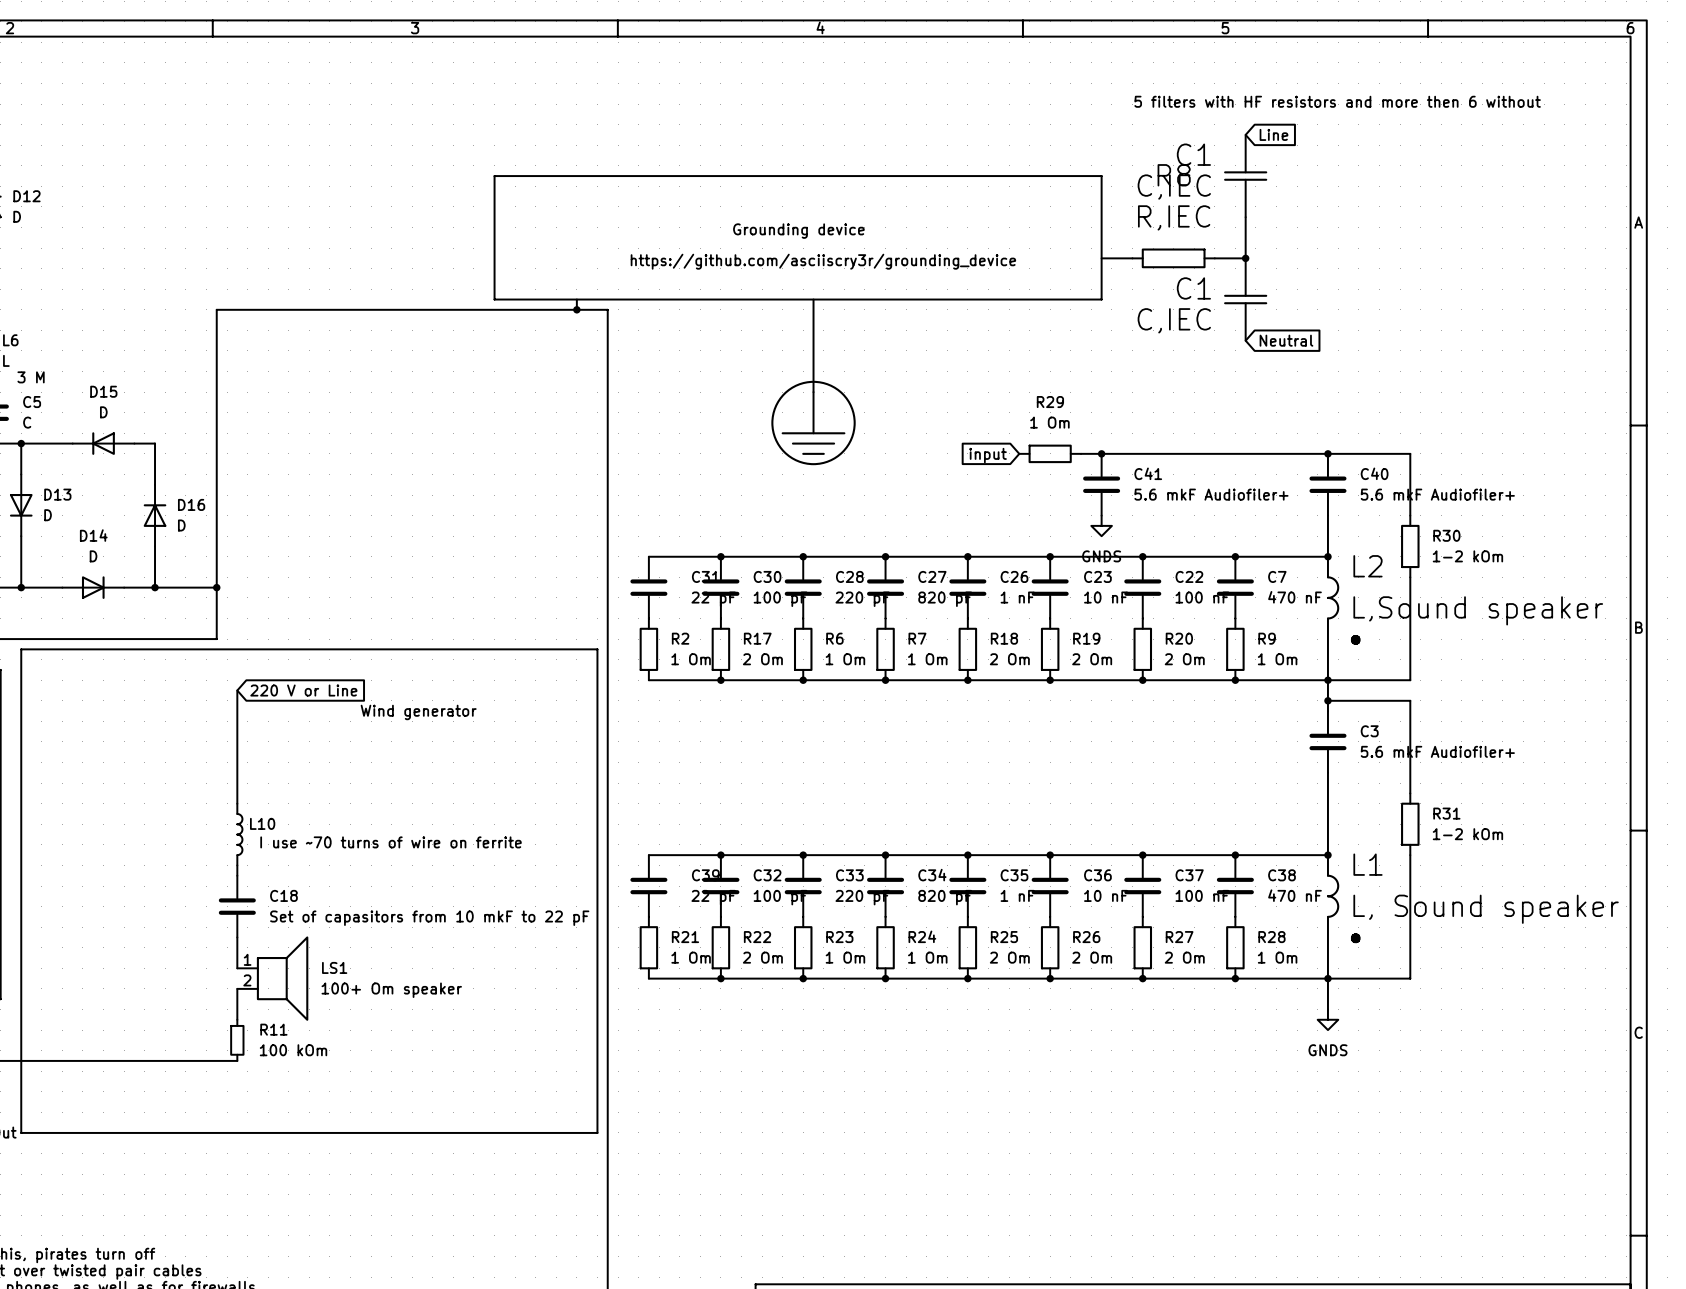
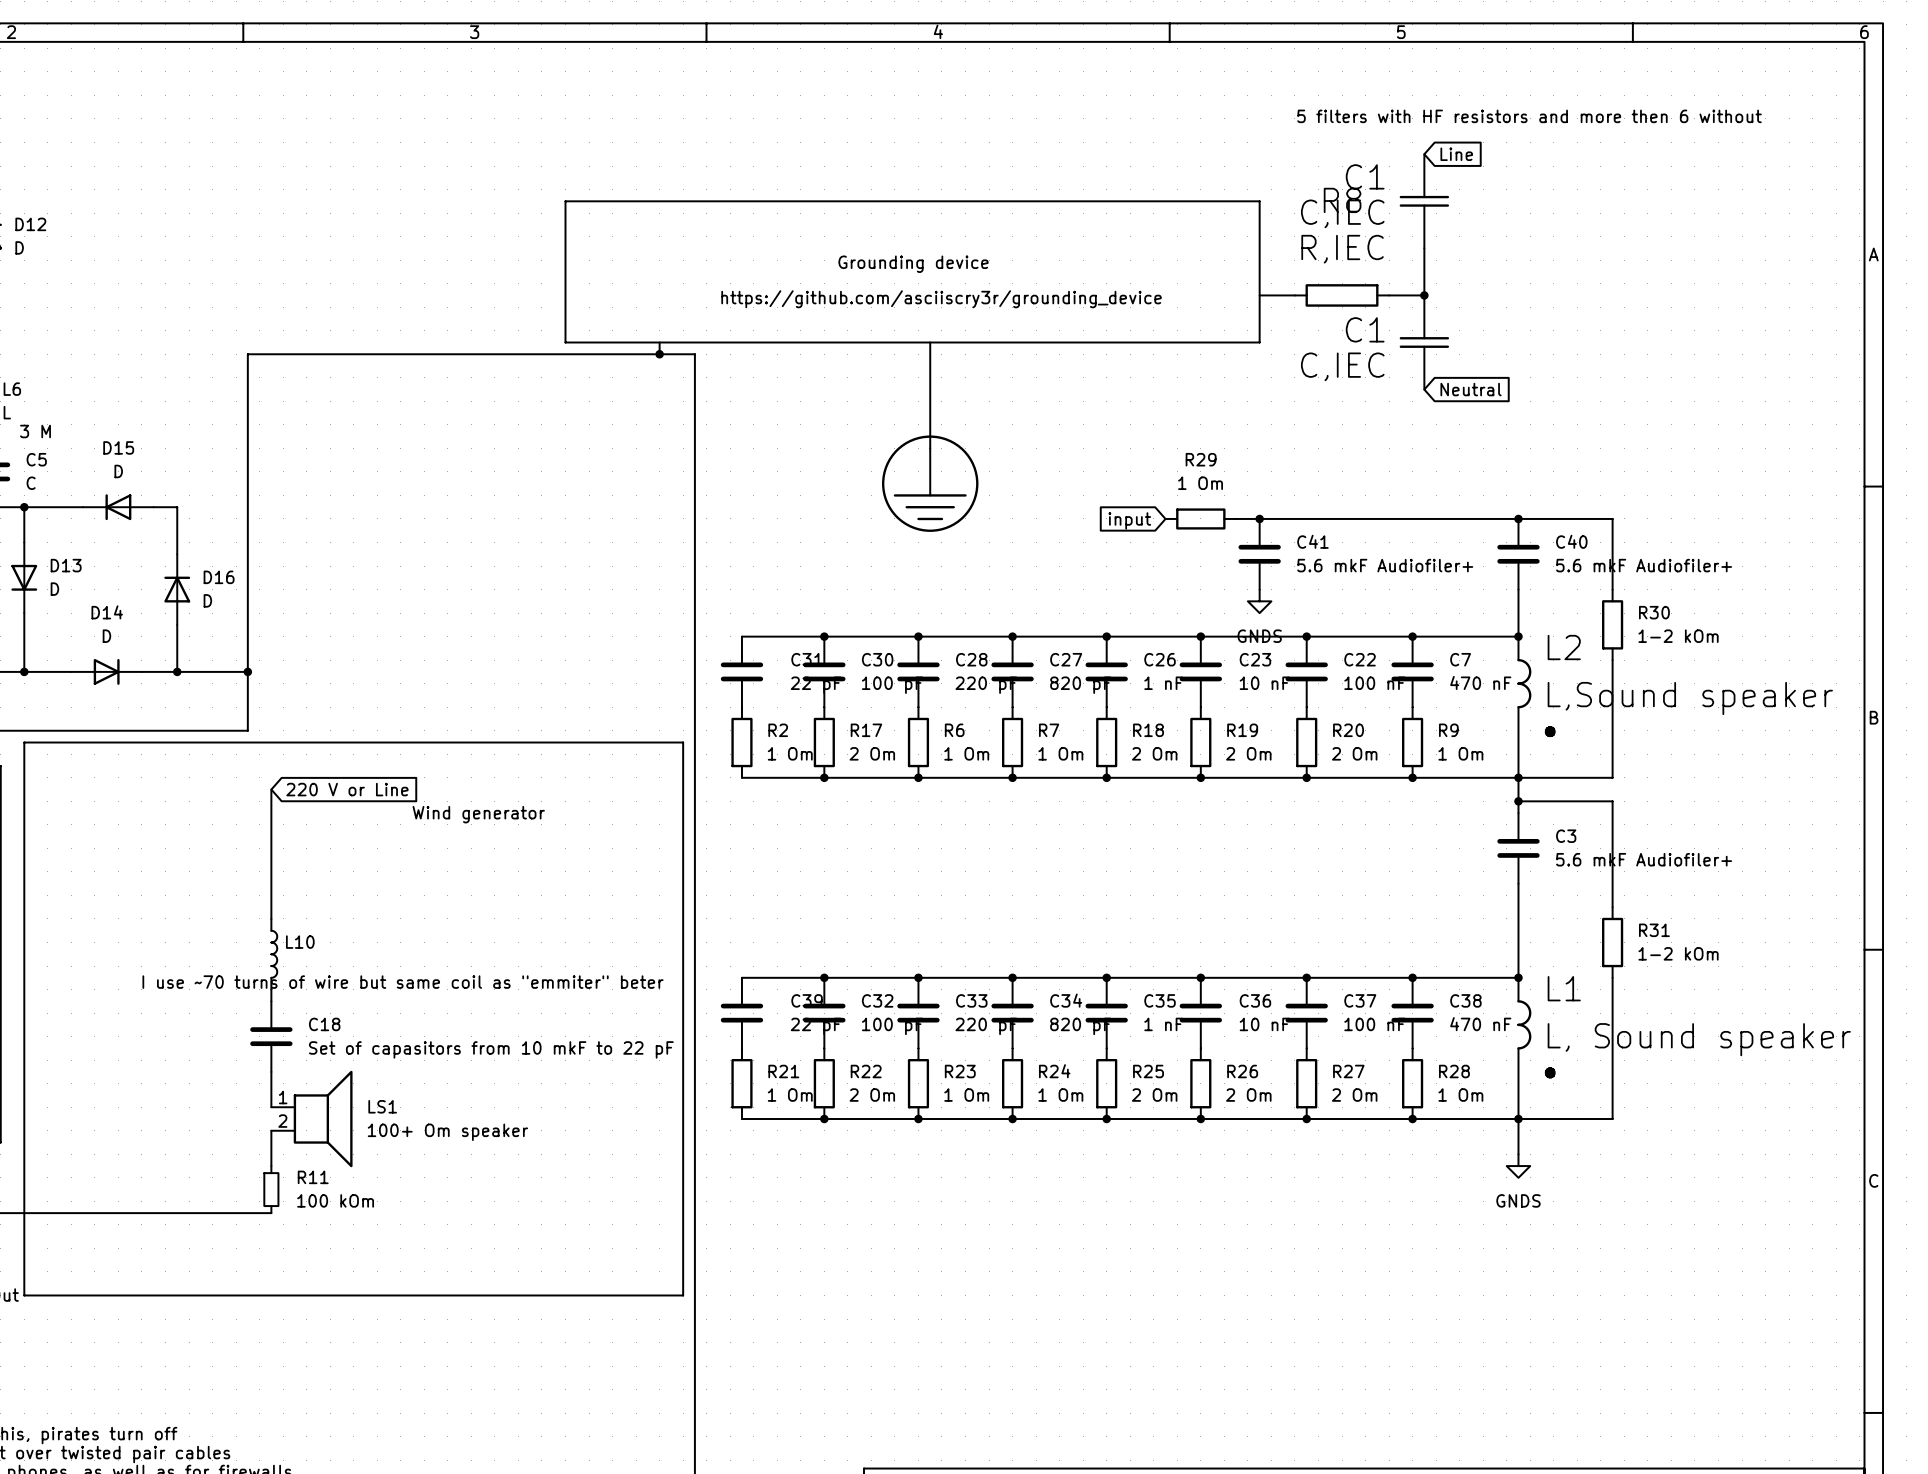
L10 value: I use ~70 turns of wire on ferrite (391, 842) -> I use ~70 turns of wire but same coil as "emmiter" beter (403, 982)

